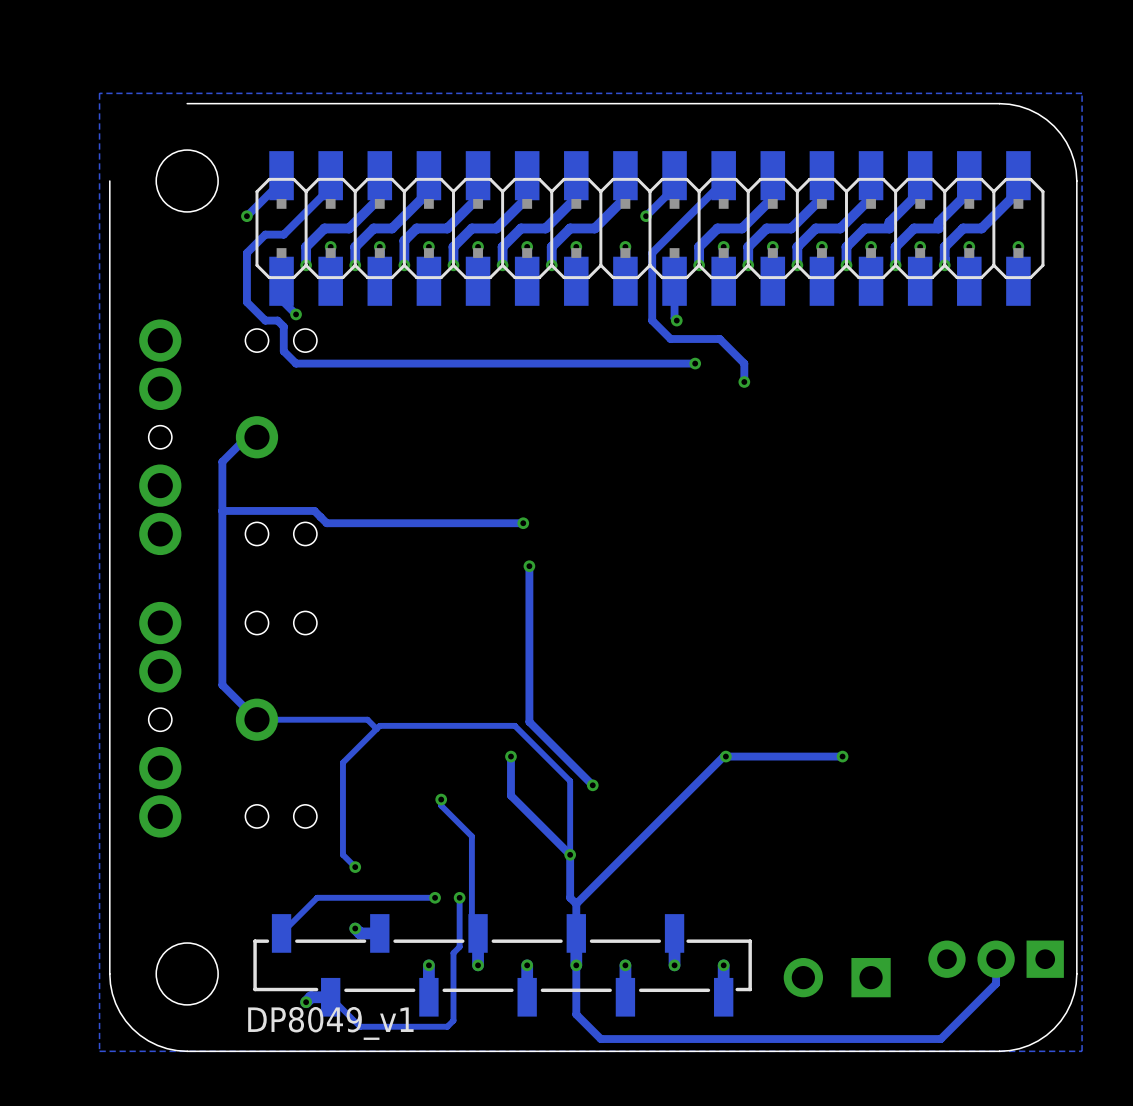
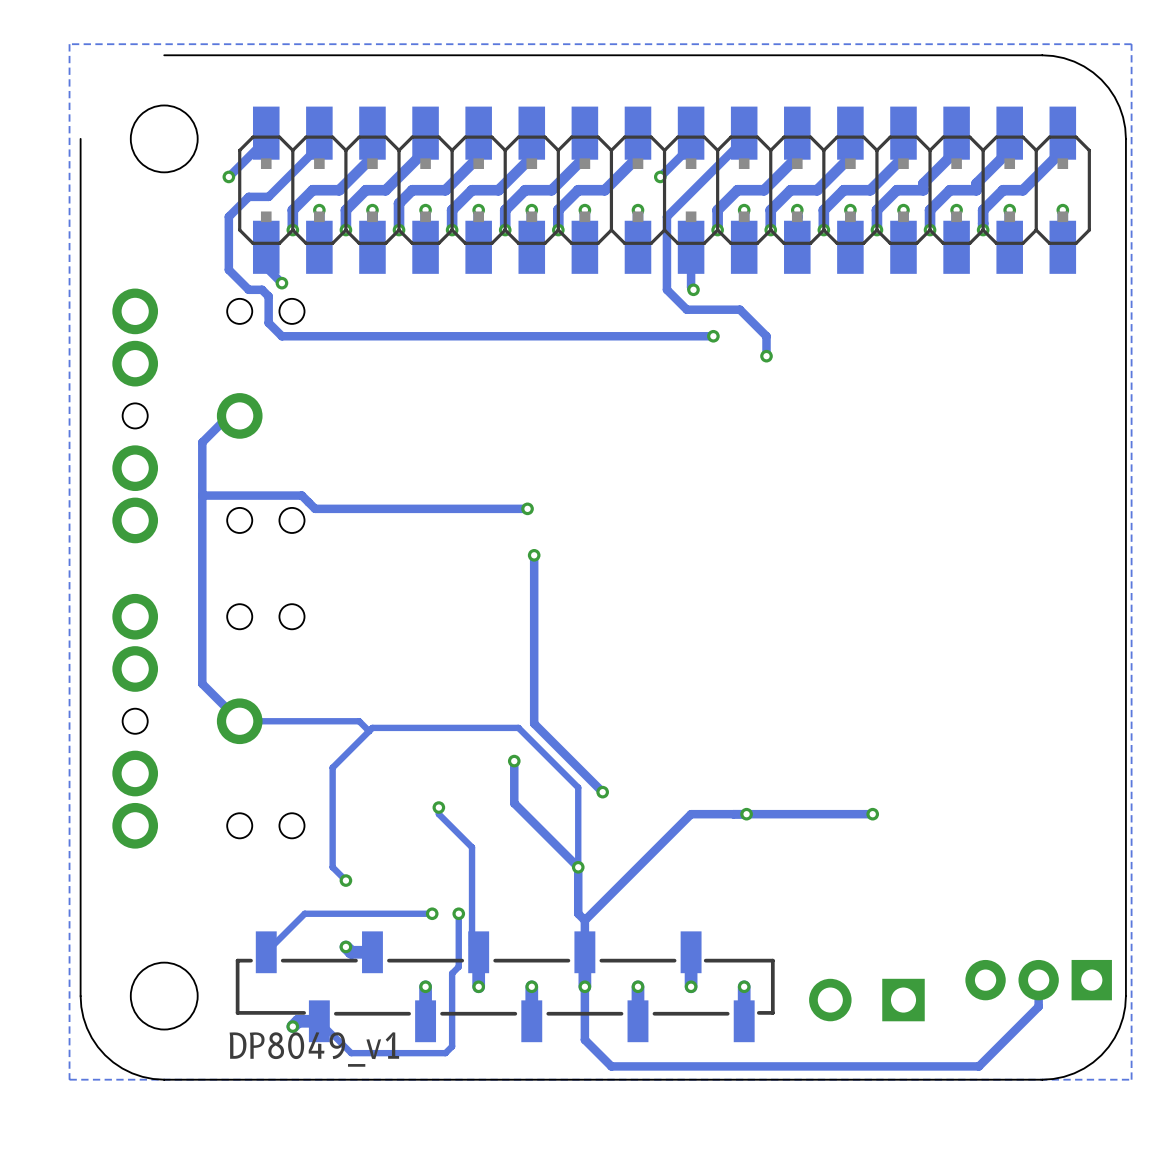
via position: (725, 756) -> (746, 814)
track: (842, 756) (723, 756) (674, 805) -> (872, 814) (691, 814)
via position: (842, 756) -> (872, 814)

